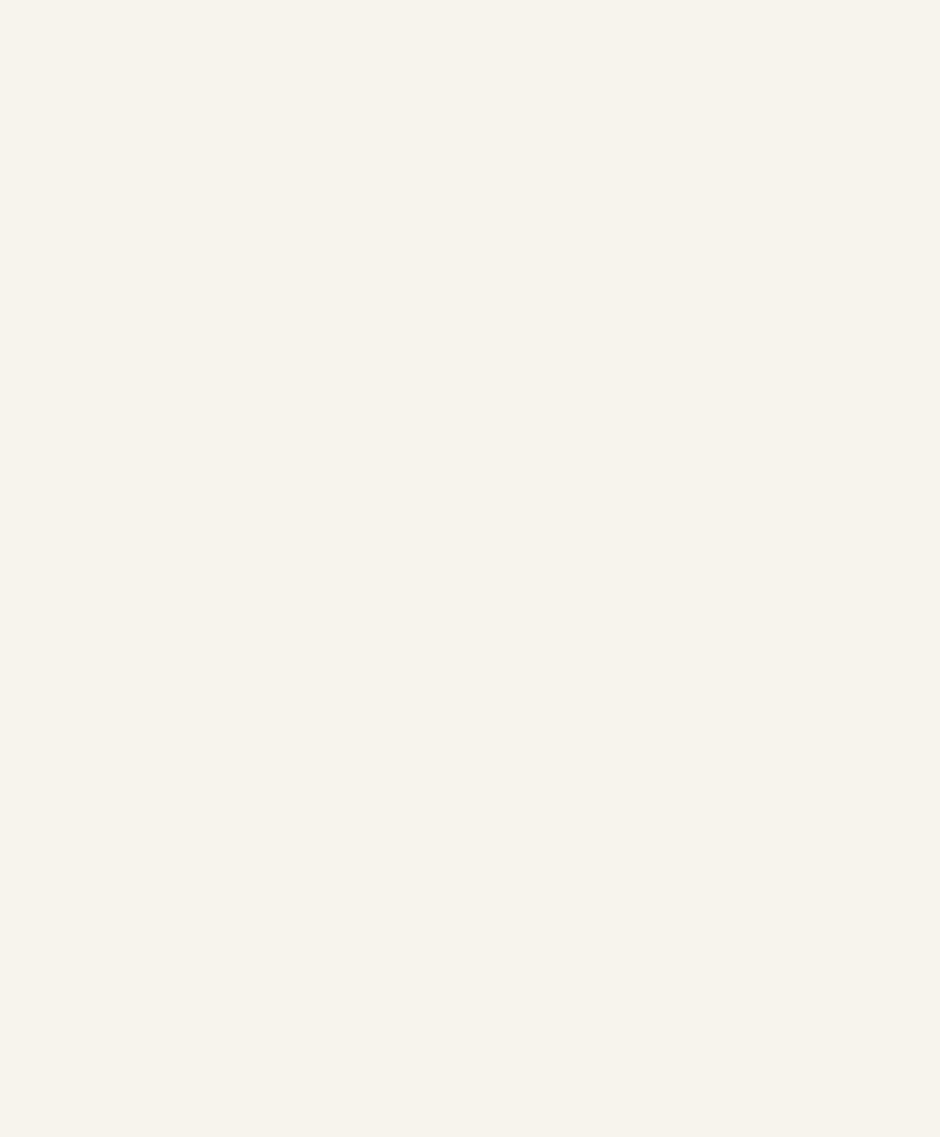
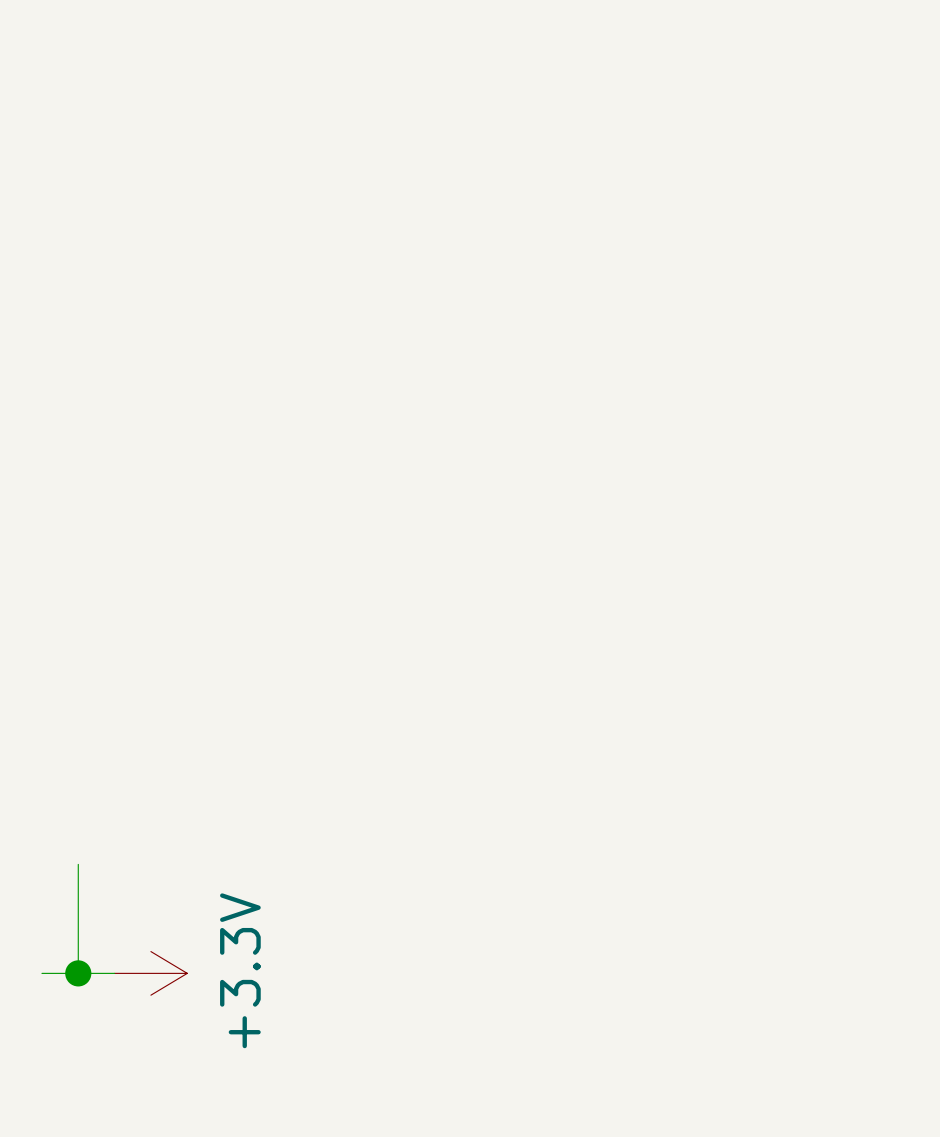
wire: none -> (78, 864) (78, 973)
wire: none -> (41, 973) (114, 973)
junction: none -> (78, 973)
power symbol: none -> +3.3V (150, 973)

